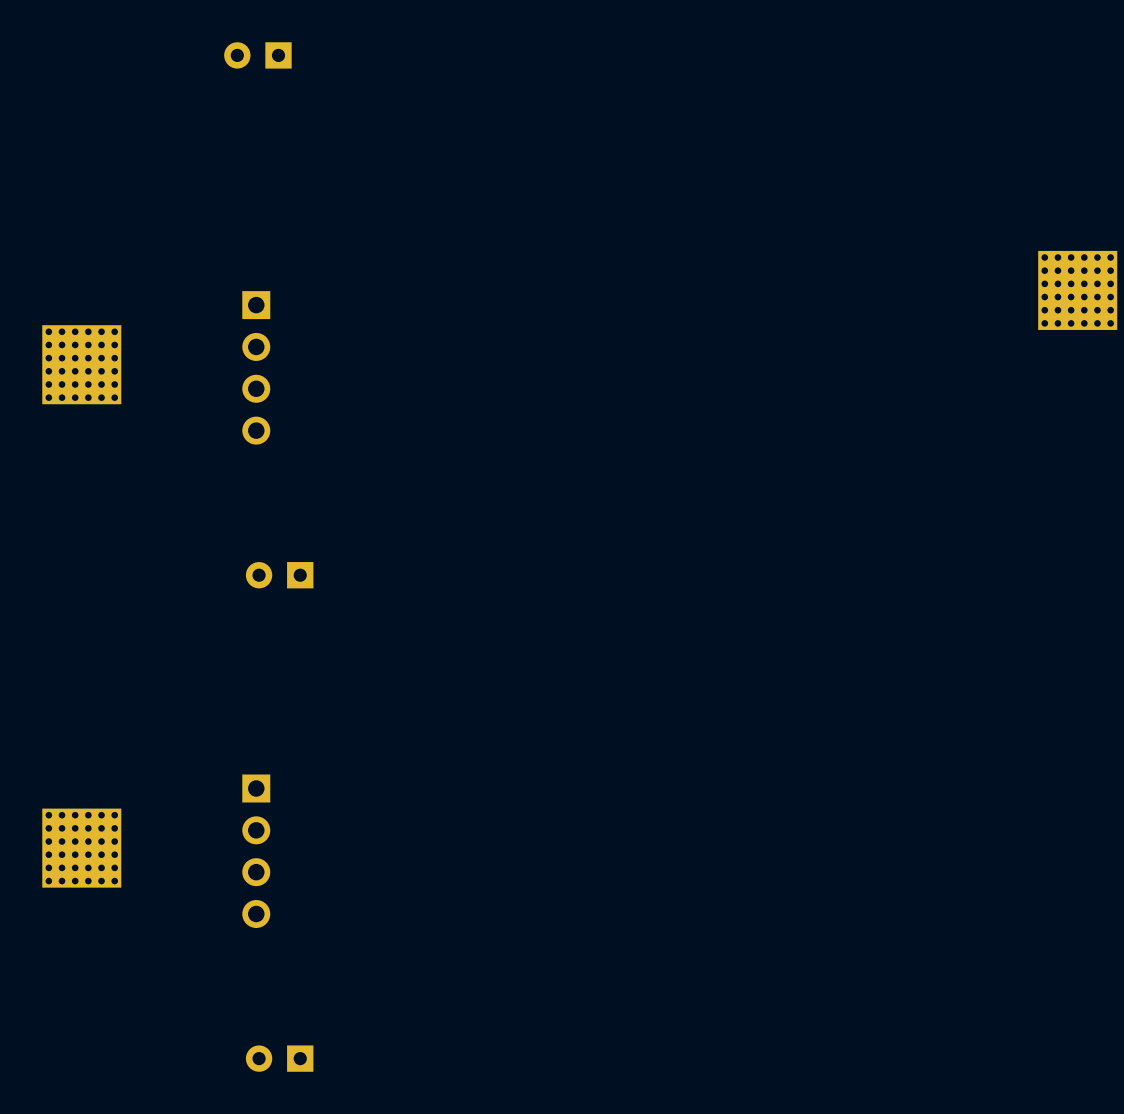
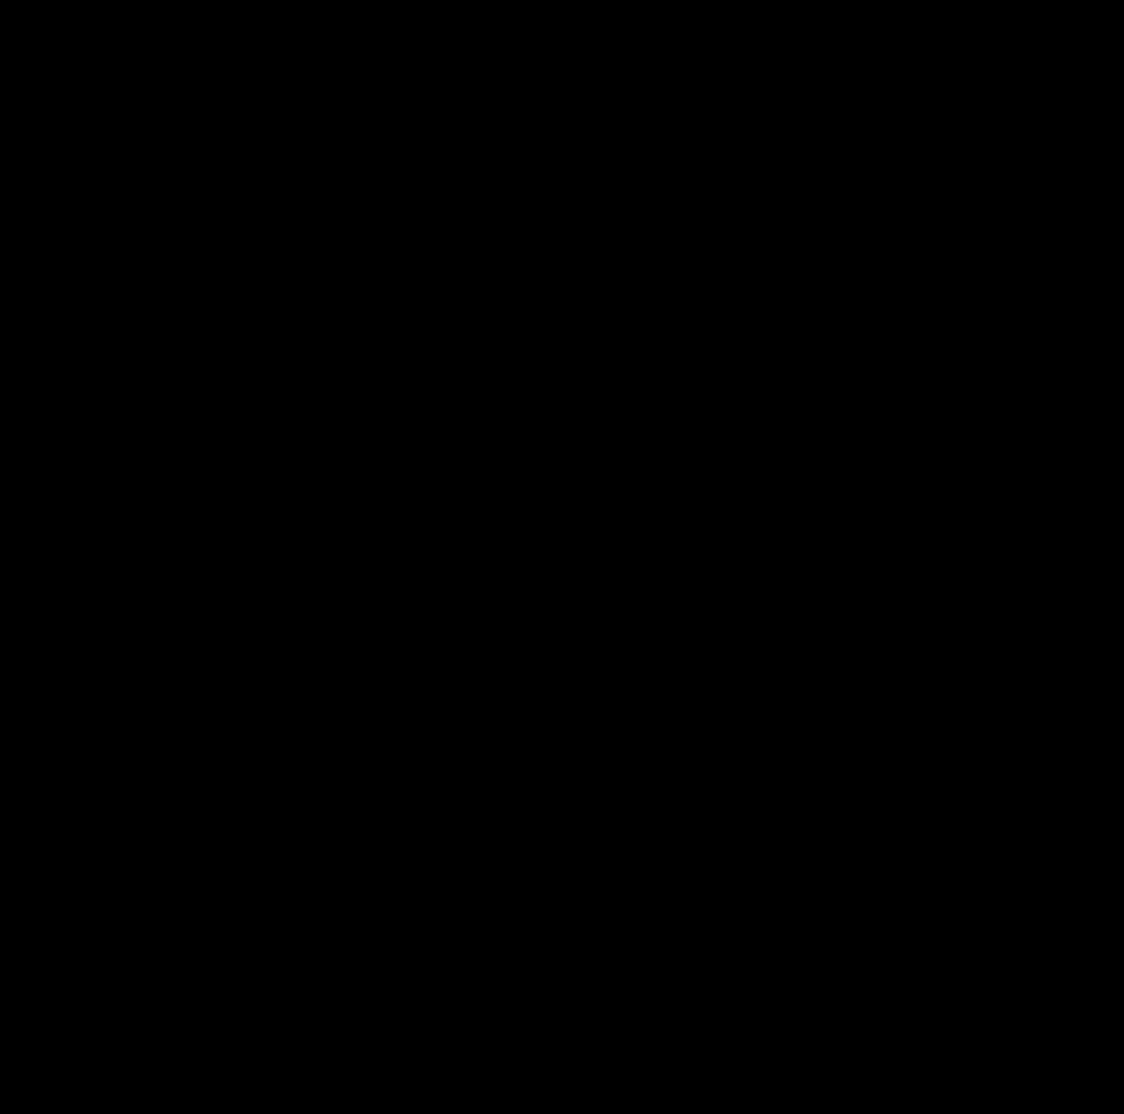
part: (257, 55) -> none
part: (1077, 290) -> none
part: (81, 364) -> none
part: (256, 367) -> none
part: (279, 575) -> none
part: (81, 848) -> none
part: (256, 851) -> none
part: (279, 1058) -> none

